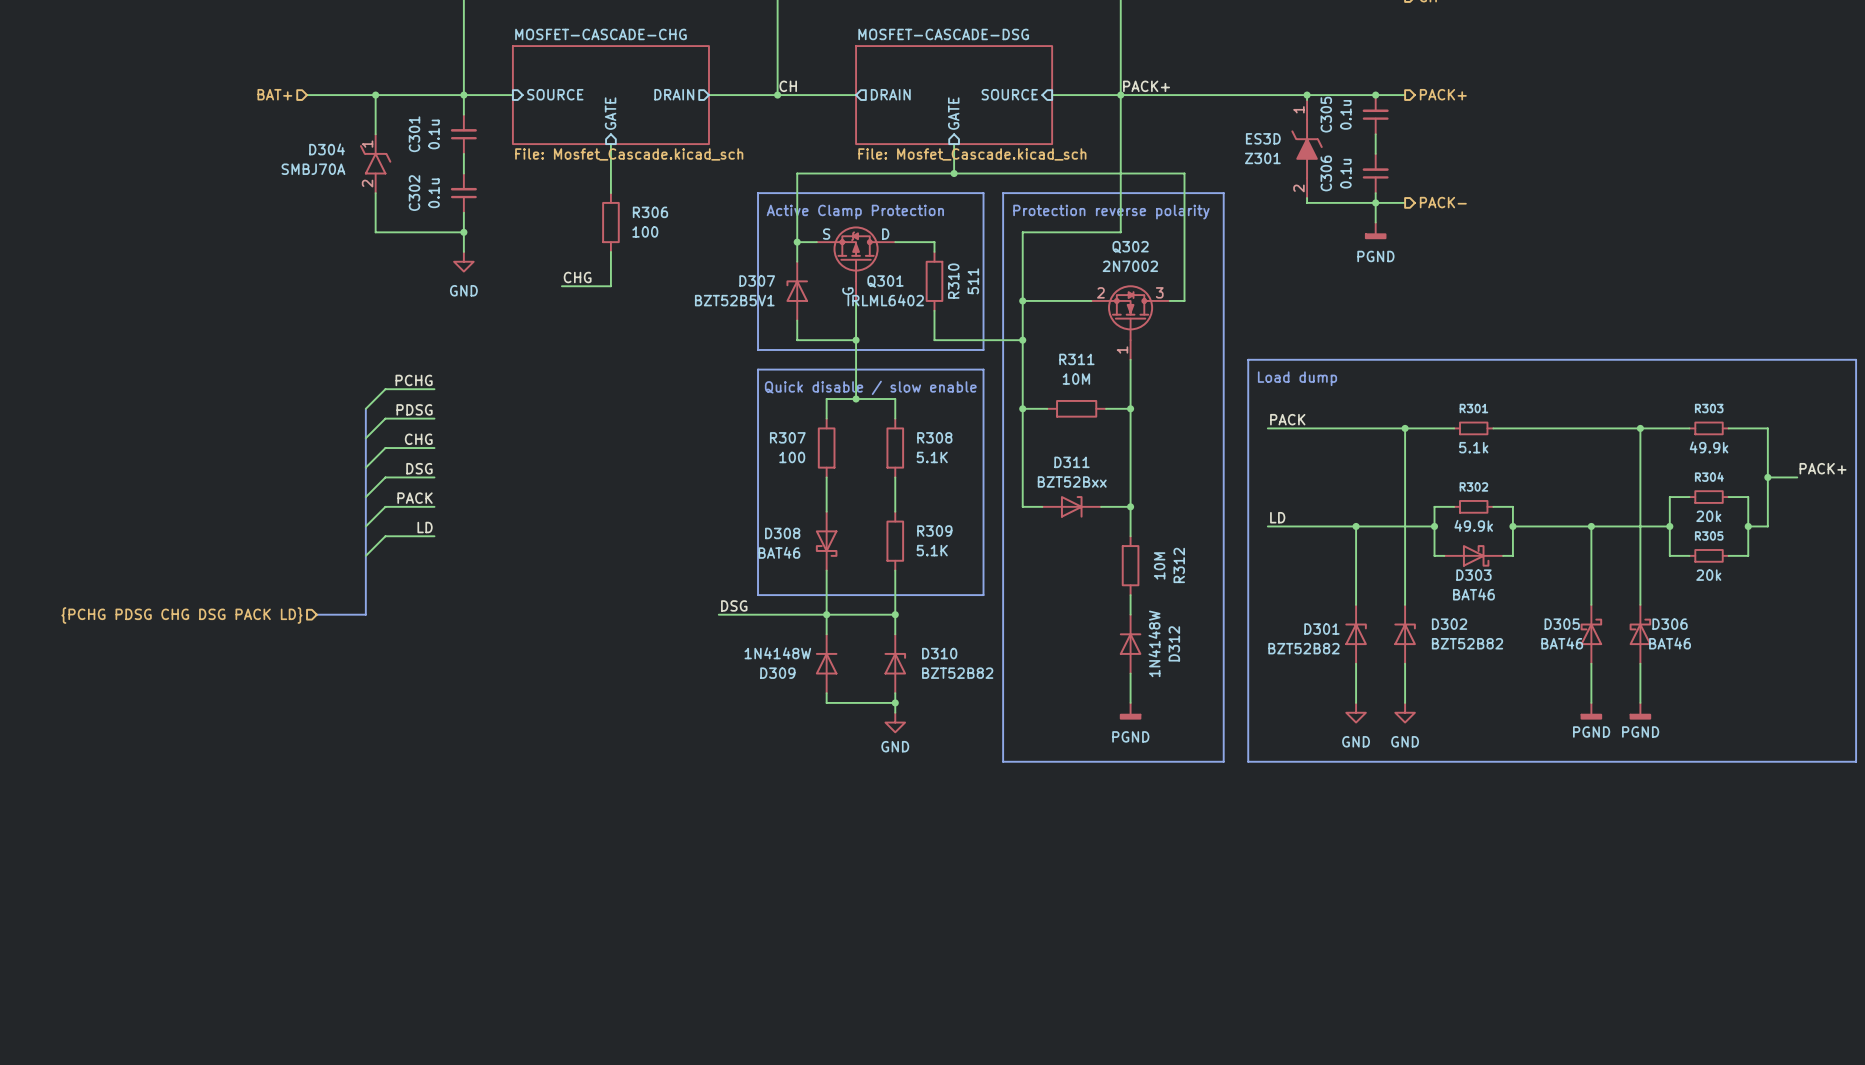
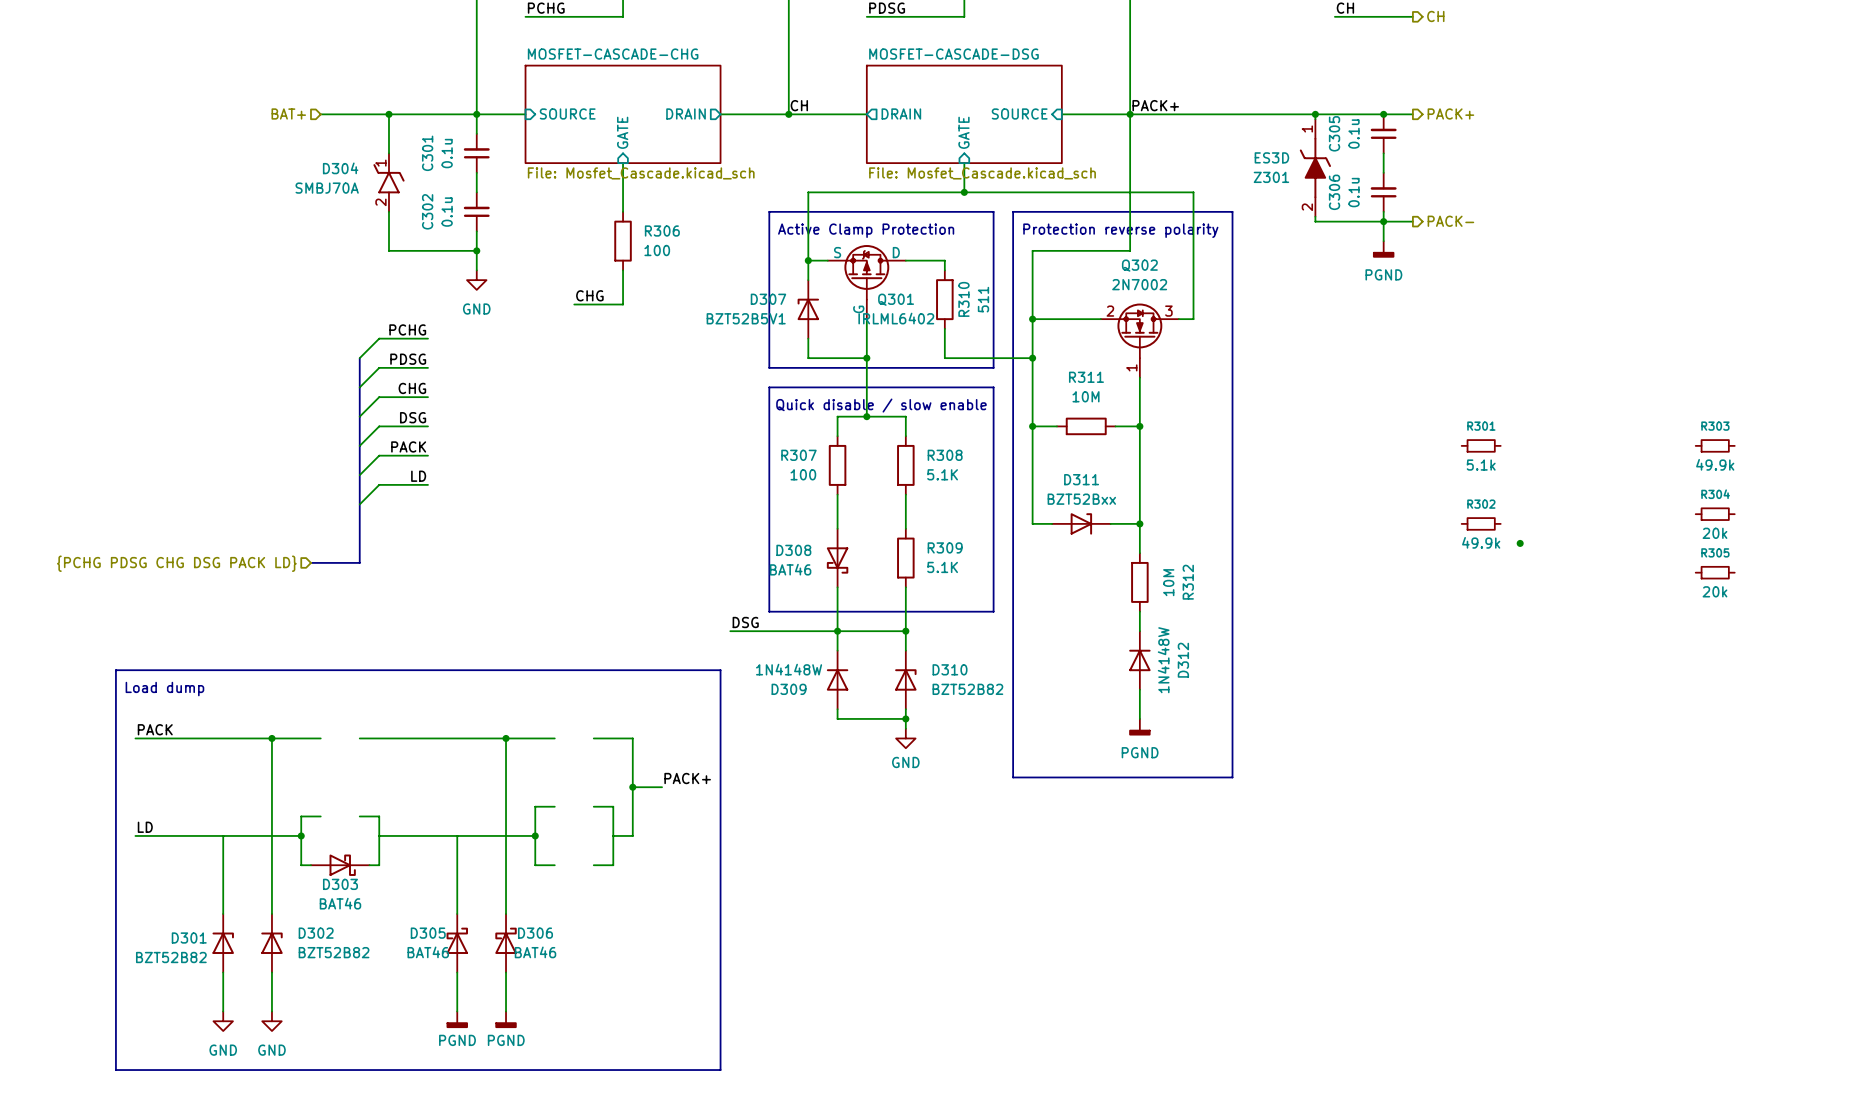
line: (1248, 359) (1856, 359) (1856, 761) (1248, 761) (1248, 359) -> none
text: Load dump (1297, 378) -> none
label position: PCHG (414, 380) -> PCHG (407, 329)
wire: (434, 389) (385, 389) (365, 408) -> (428, 338) (379, 338) (359, 358)
bus: (365, 408) (365, 614) (316, 614) -> (359, 358) (359, 562) (310, 562)
label position: PDSG (414, 409) -> PDSG (408, 359)
wire: (434, 418) (385, 418) (365, 438) -> (428, 367) (379, 367) (359, 387)
label: PACK (1287, 419) -> none
wire: (1267, 428) (1454, 428) -> none
wire: (1405, 428) (1405, 604) -> none
junction: (1405, 428) -> none
wire: (1493, 428) (1689, 428) -> none
wire: (1640, 428) (1640, 604) -> none
junction: (1640, 428) -> none
wire: (1728, 428) (1767, 428) (1767, 526) (1748, 526) -> none
label position: CHG (418, 439) -> CHG (412, 388)
wire: (434, 448) (385, 448) (365, 467) -> (428, 397) (379, 397) (359, 416)
label position: DSG (419, 468) -> DSG (413, 417)
label: PACK+ (1823, 468) -> none
wire: (434, 477) (385, 477) (365, 497) -> (428, 426) (379, 426) (359, 445)
wire: (1767, 477) (1797, 477) -> none
junction: (1767, 477) -> none
wire: (1689, 497) (1669, 497) (1669, 555) (1689, 555) -> none
wire: (1728, 497) (1748, 497) (1748, 555) (1728, 555) -> none
label position: PACK (415, 498) -> PACK (408, 446)
wire: (434, 506) (385, 506) (365, 526) -> (428, 455) (379, 455) (359, 475)
wire: (1454, 506) (1434, 506) (1434, 555) (1444, 555) -> none
wire: (1493, 506) (1512, 506) (1512, 555) (1503, 555) -> none
label: LD (1277, 517) -> none
wire: (1267, 526) (1434, 526) -> none
wire: (1356, 526) (1356, 604) -> none
junction: (1356, 526) -> none
junction: (1434, 526) -> none
wire: (1512, 526) (1669, 526) -> none
wire: (1591, 526) (1591, 604) -> none
junction: (1591, 526) -> none
junction: (1669, 526) -> none
junction: (1748, 526) -> none
label position: LD (425, 527) -> LD (418, 476)
wire: (434, 536) (385, 536) (365, 555) -> (428, 484) (379, 484) (359, 504)
D303 position: (1473, 555) -> (340, 865)
hierarchical label position: {PCHG PDSG CHG DSG PACK LD} (181, 615) -> {PCHG PDSG CHG DSG PACK LD} (176, 563)
D301 position: (1356, 634) -> (223, 943)
D302 position: (1405, 634) -> (271, 943)
D305 position: (1591, 634) -> (457, 943)
D306 position: (1640, 634) -> (506, 943)
line: none -> (115, 670) (720, 670) (720, 1070) (115, 1070) (115, 670)
wire: (1356, 663) (1356, 702) -> none
wire: (1405, 663) (1405, 702) -> none
wire: (1591, 663) (1591, 702) -> none
wire: (1640, 663) (1640, 702) -> none
text: none -> Load dump (164, 689)
power symbol: PGND (1591, 711) -> none
power symbol: PGND (1640, 711) -> none
power symbol: GND (1356, 712) -> none
power symbol: GND (1405, 712) -> none
label: none -> PACK (155, 729)
wire: none -> (135, 738) (320, 738)
wire: none -> (271, 738) (271, 913)
junction: none -> (271, 738)
wire: none -> (359, 738) (554, 738)
wire: none -> (506, 738) (506, 913)
junction: none -> (506, 738)
wire: none -> (593, 738) (632, 738) (632, 835) (613, 835)
label: none -> PACK+ (687, 778)
wire: none -> (632, 787) (662, 787)
junction: none -> (632, 787)
wire: none -> (554, 806) (535, 806) (535, 865) (554, 865)
wire: none -> (593, 806) (613, 806) (613, 865) (593, 865)
wire: none -> (320, 816) (301, 816) (301, 865) (310, 865)
wire: none -> (359, 816) (379, 816) (379, 865) (369, 865)
label: none -> LD (145, 827)
wire: none -> (135, 835) (301, 835)
wire: none -> (223, 835) (223, 913)
junction: none -> (301, 835)
wire: none -> (379, 835) (535, 835)
wire: none -> (457, 835) (457, 913)
junction: none -> (535, 835)
wire: none -> (223, 972) (223, 1011)
wire: none -> (271, 972) (271, 1011)
wire: none -> (457, 972) (457, 1011)
wire: none -> (506, 972) (506, 1011)
power symbol: none -> PGND (457, 1019)
power symbol: none -> PGND (506, 1019)
power symbol: none -> GND (223, 1021)
power symbol: none -> GND (271, 1021)

